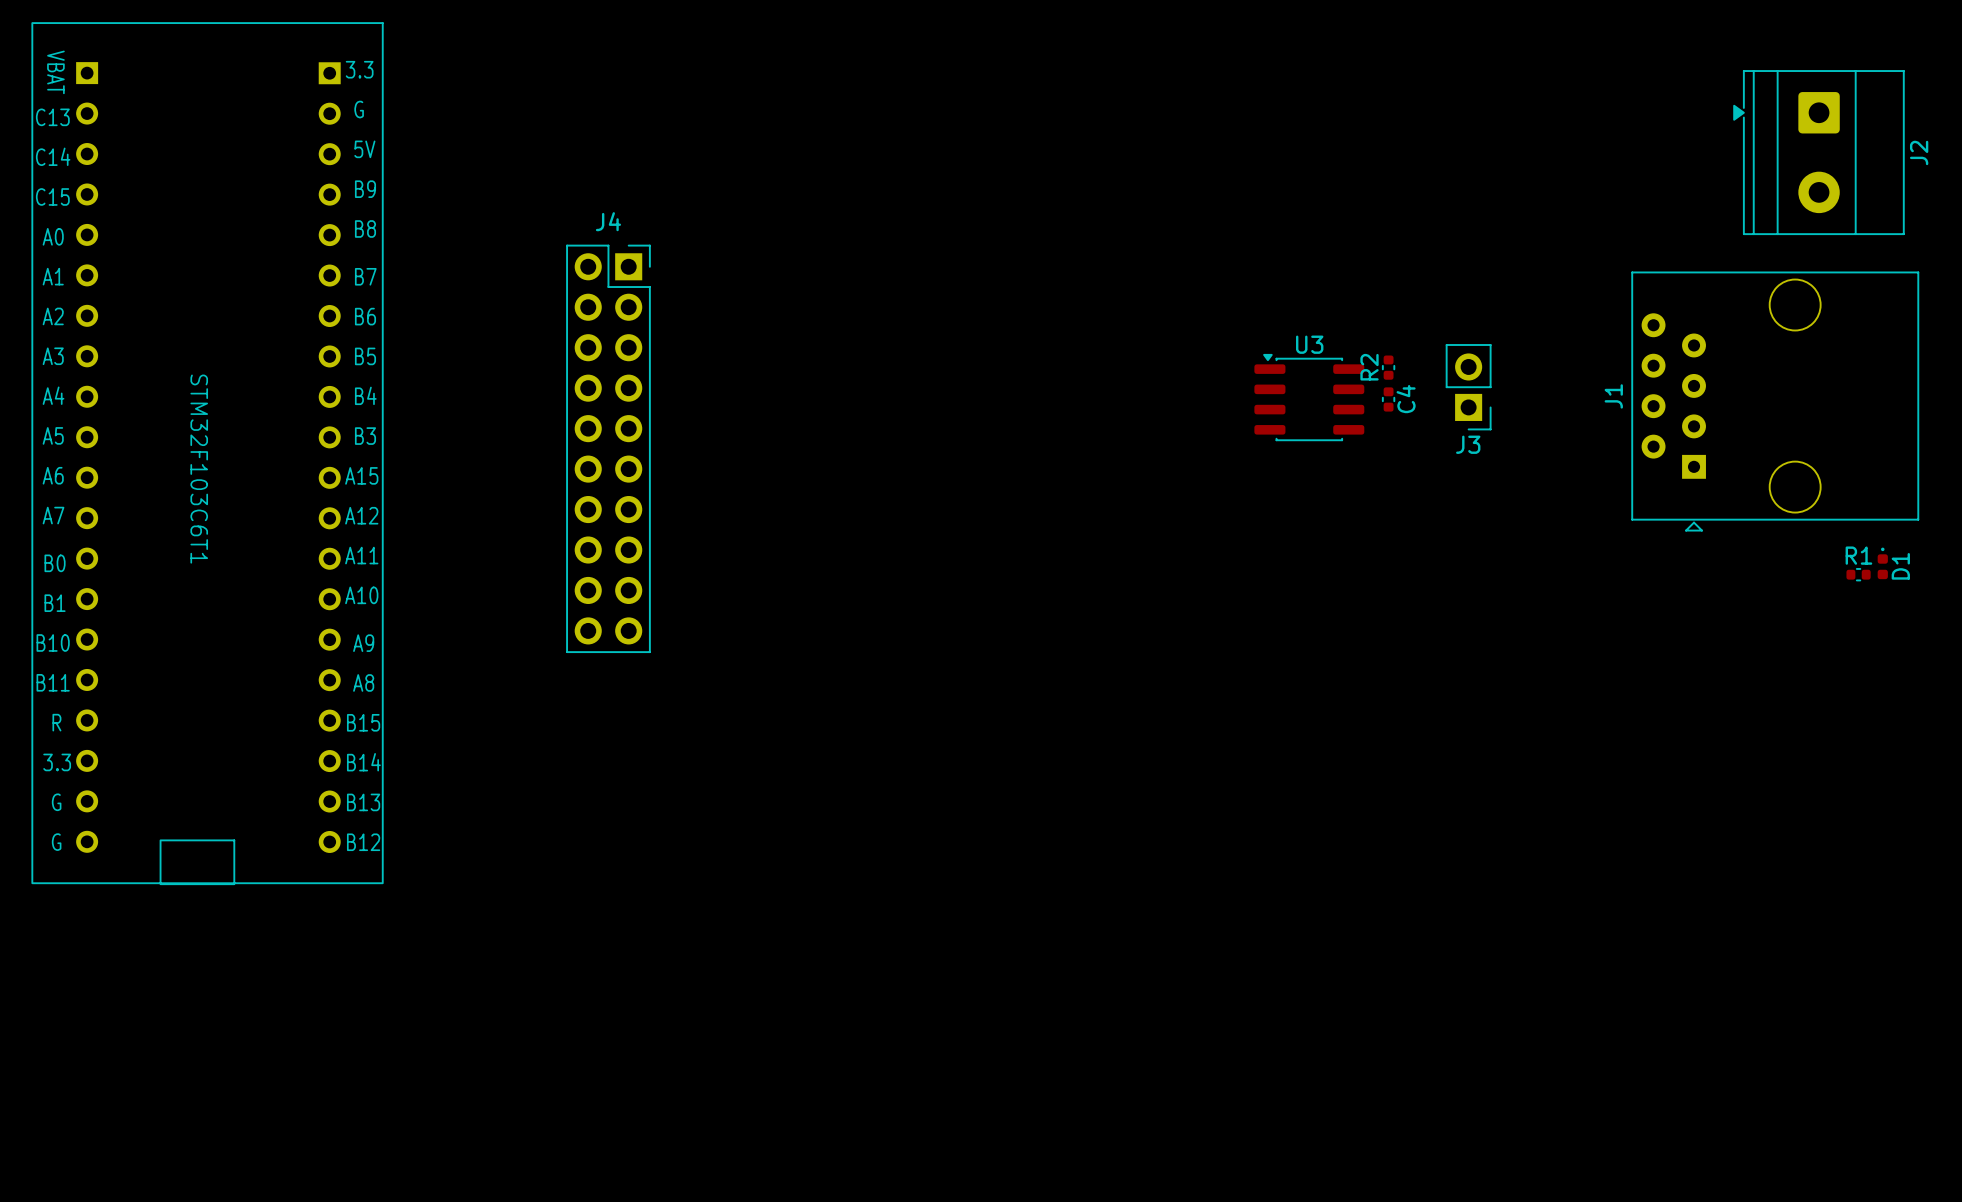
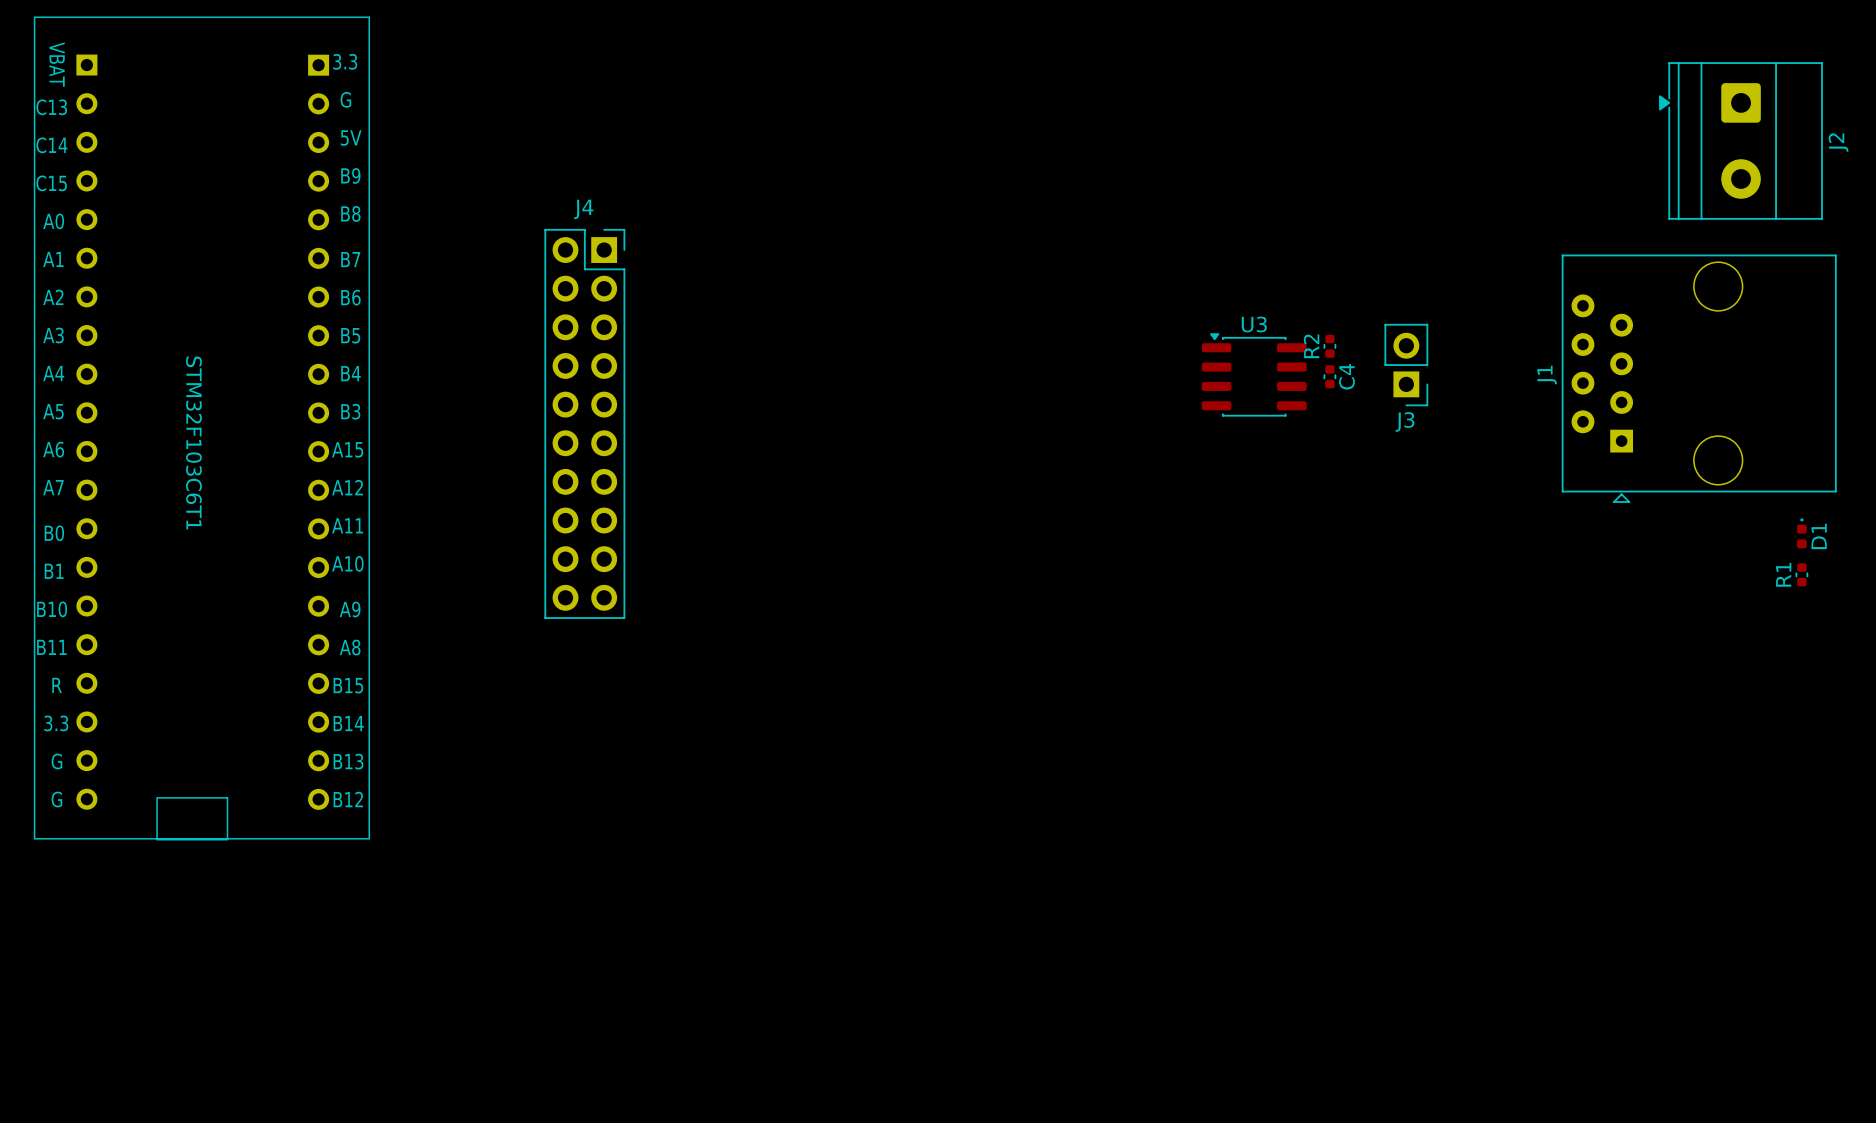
R1 rotation: 0° (1858, 574) -> 90° clockwise (1801, 574)
R1 position: (1858, 574) -> (1801, 574)

